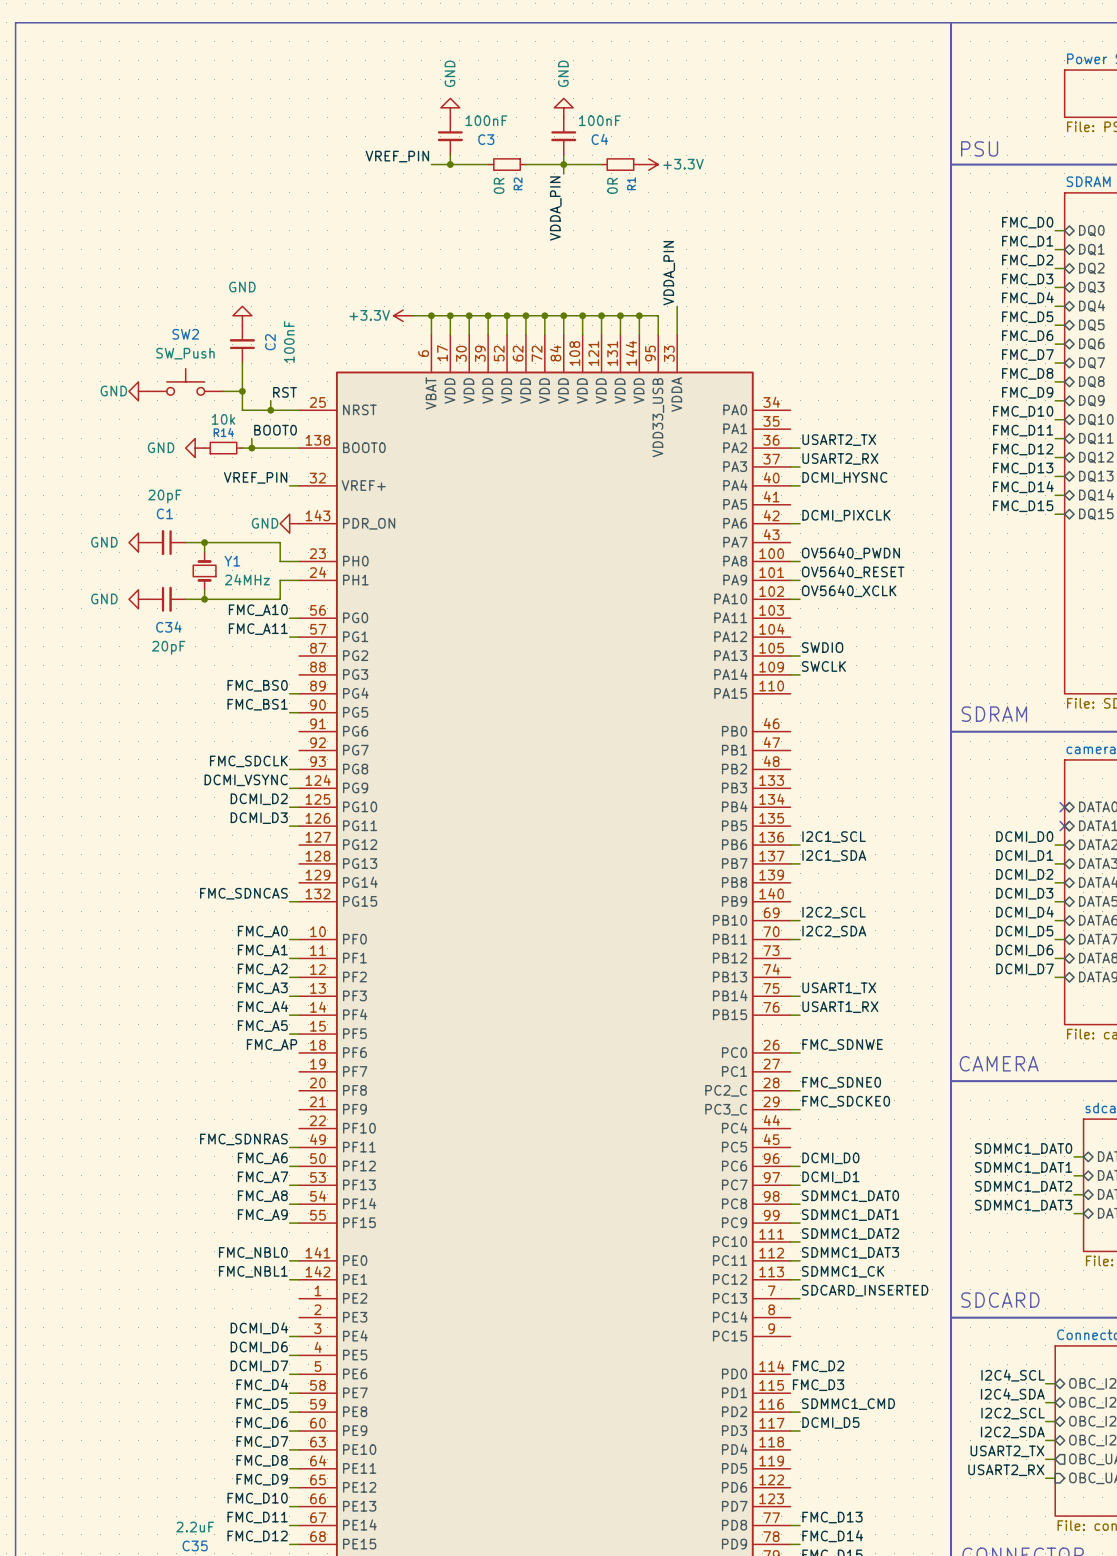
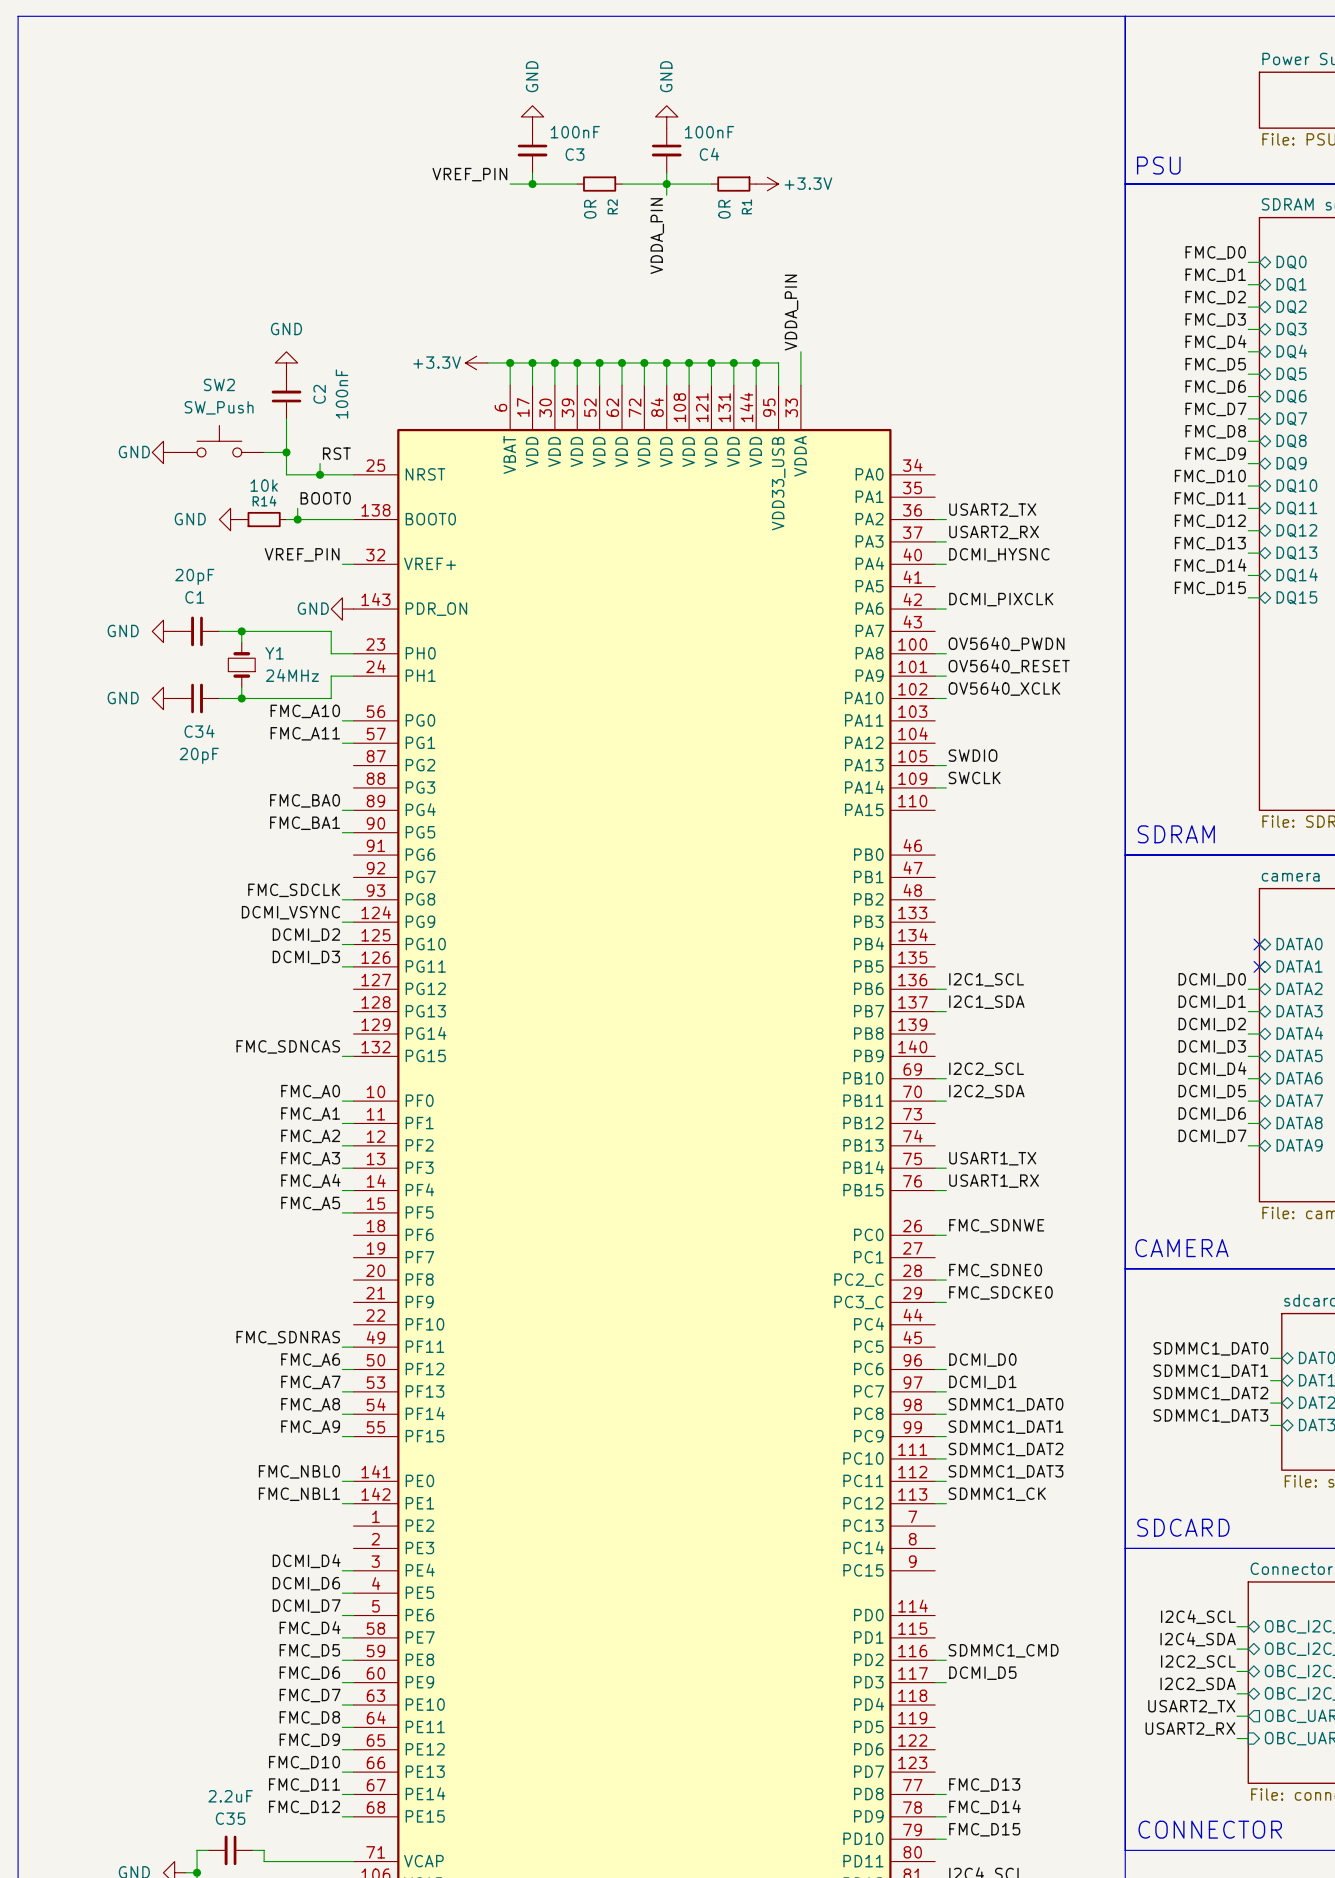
label: FMC_BS0 (257, 685) -> FMC_BA0 (305, 800)
label: FMC_BS1 (257, 704) -> FMC_BA1 (305, 823)
label: FMC_AP (272, 1044) -> none
label: SDCARD_INSERTED (865, 1290) -> none
wire: (790, 1298) (800, 1298) -> none
label: FMC_D2 (818, 1366) -> none
label: FMC_D3 (818, 1385) -> none

